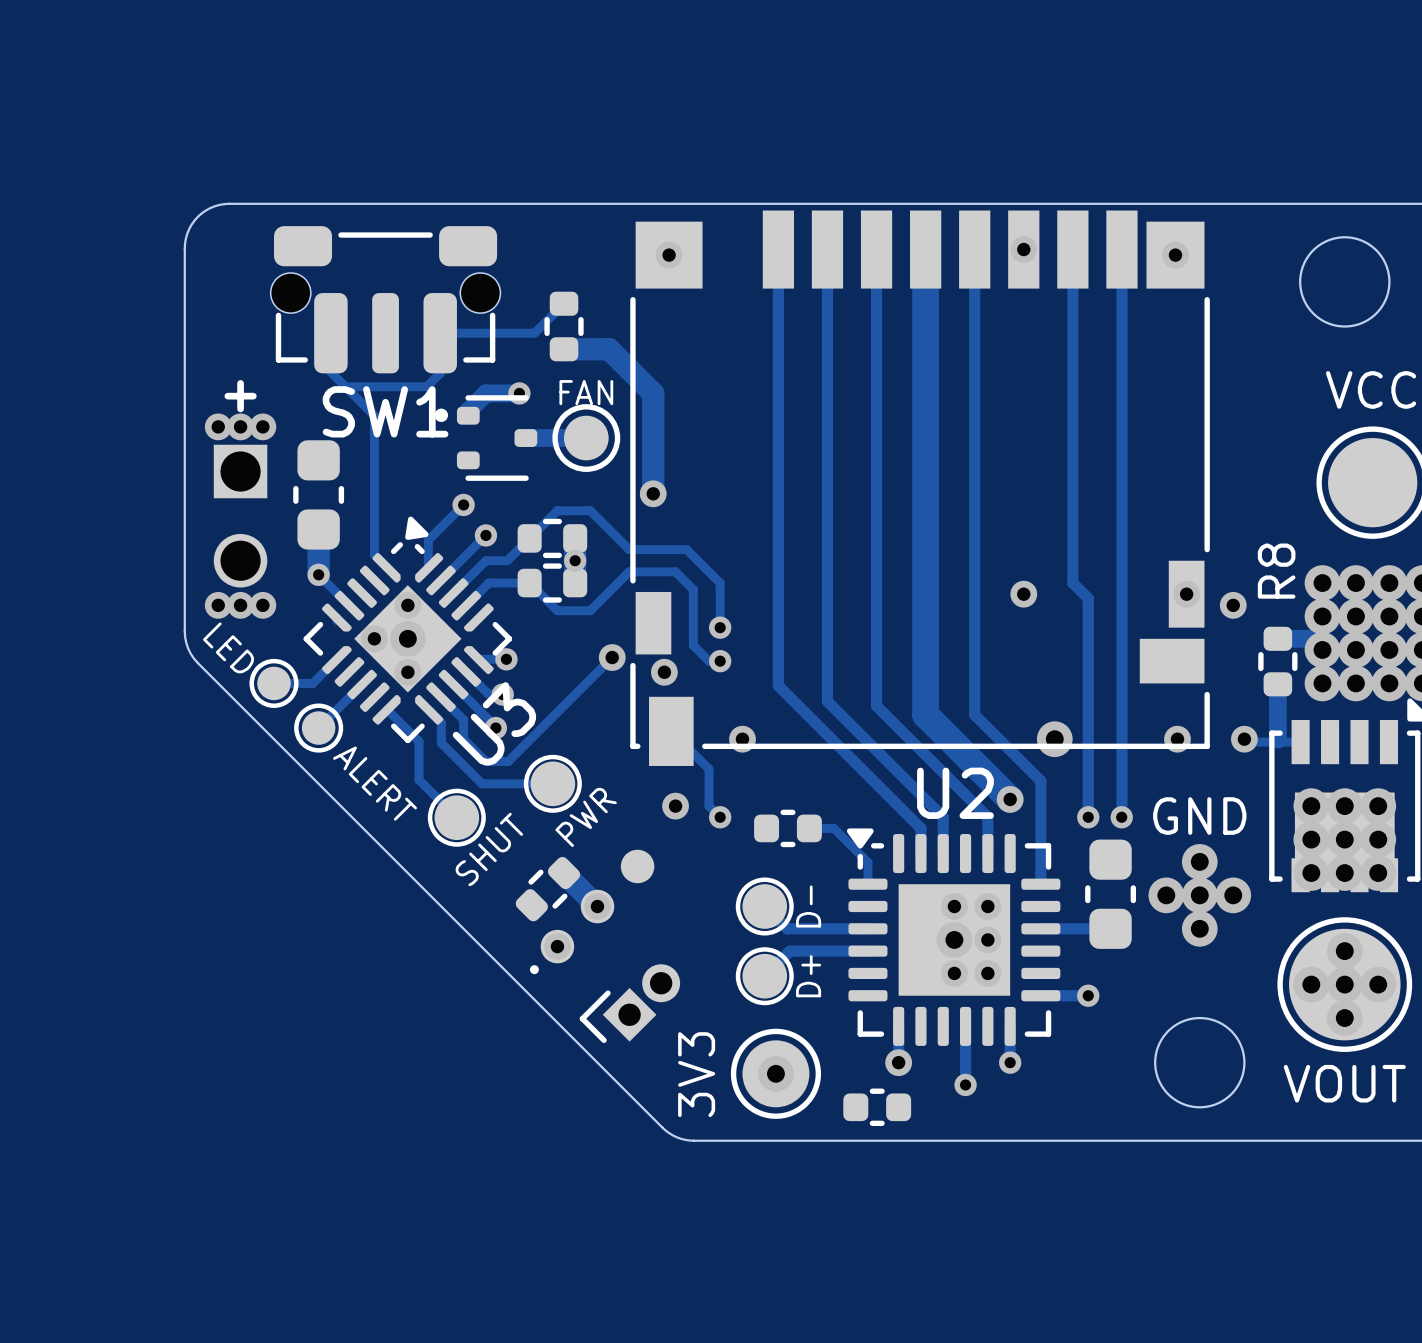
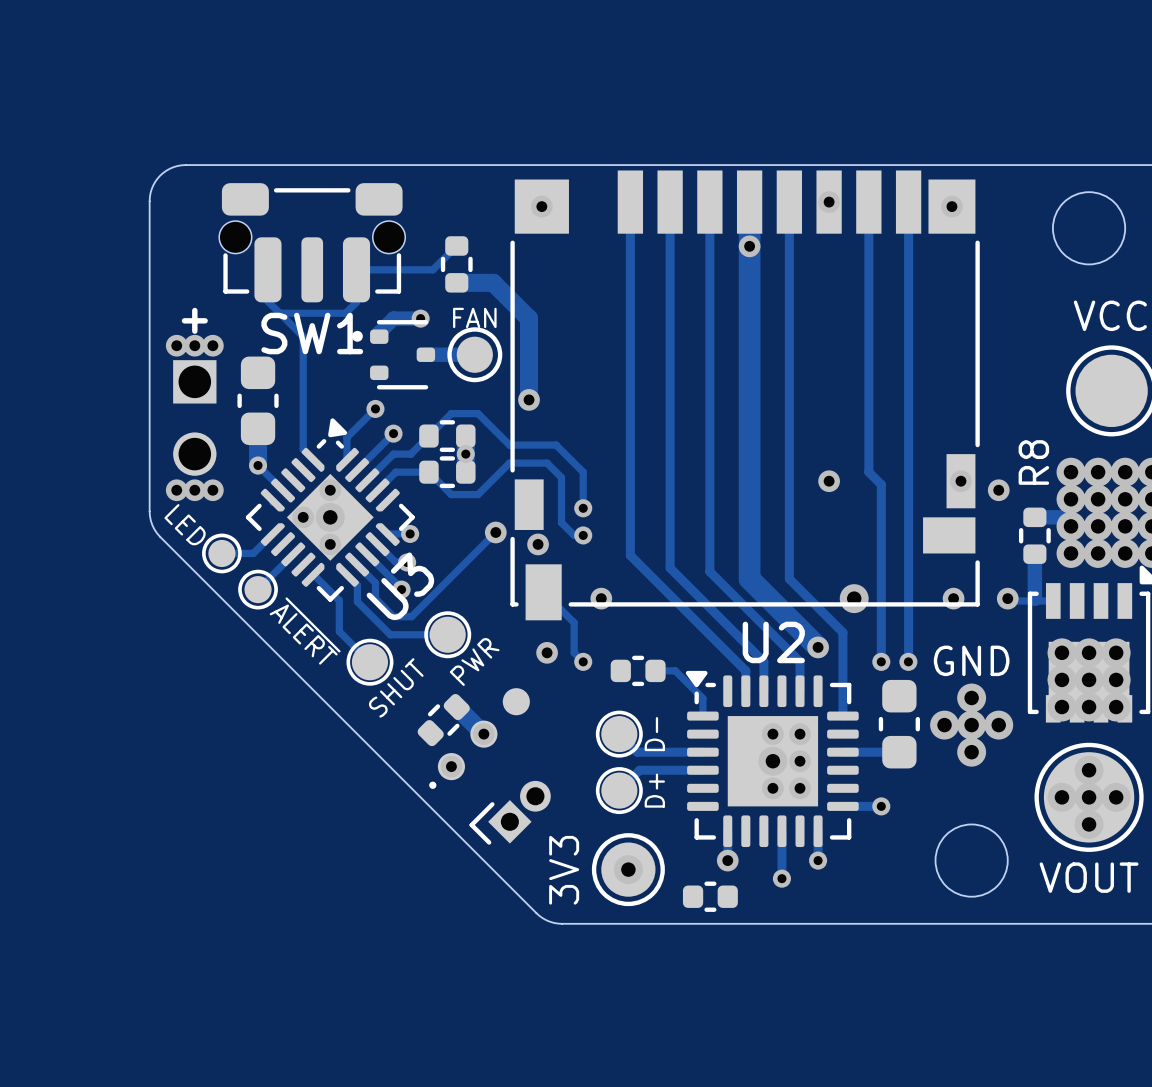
via: none -> (749, 246)
part value: ALERT (374, 783) -> ~{ALERT} (305, 631)

